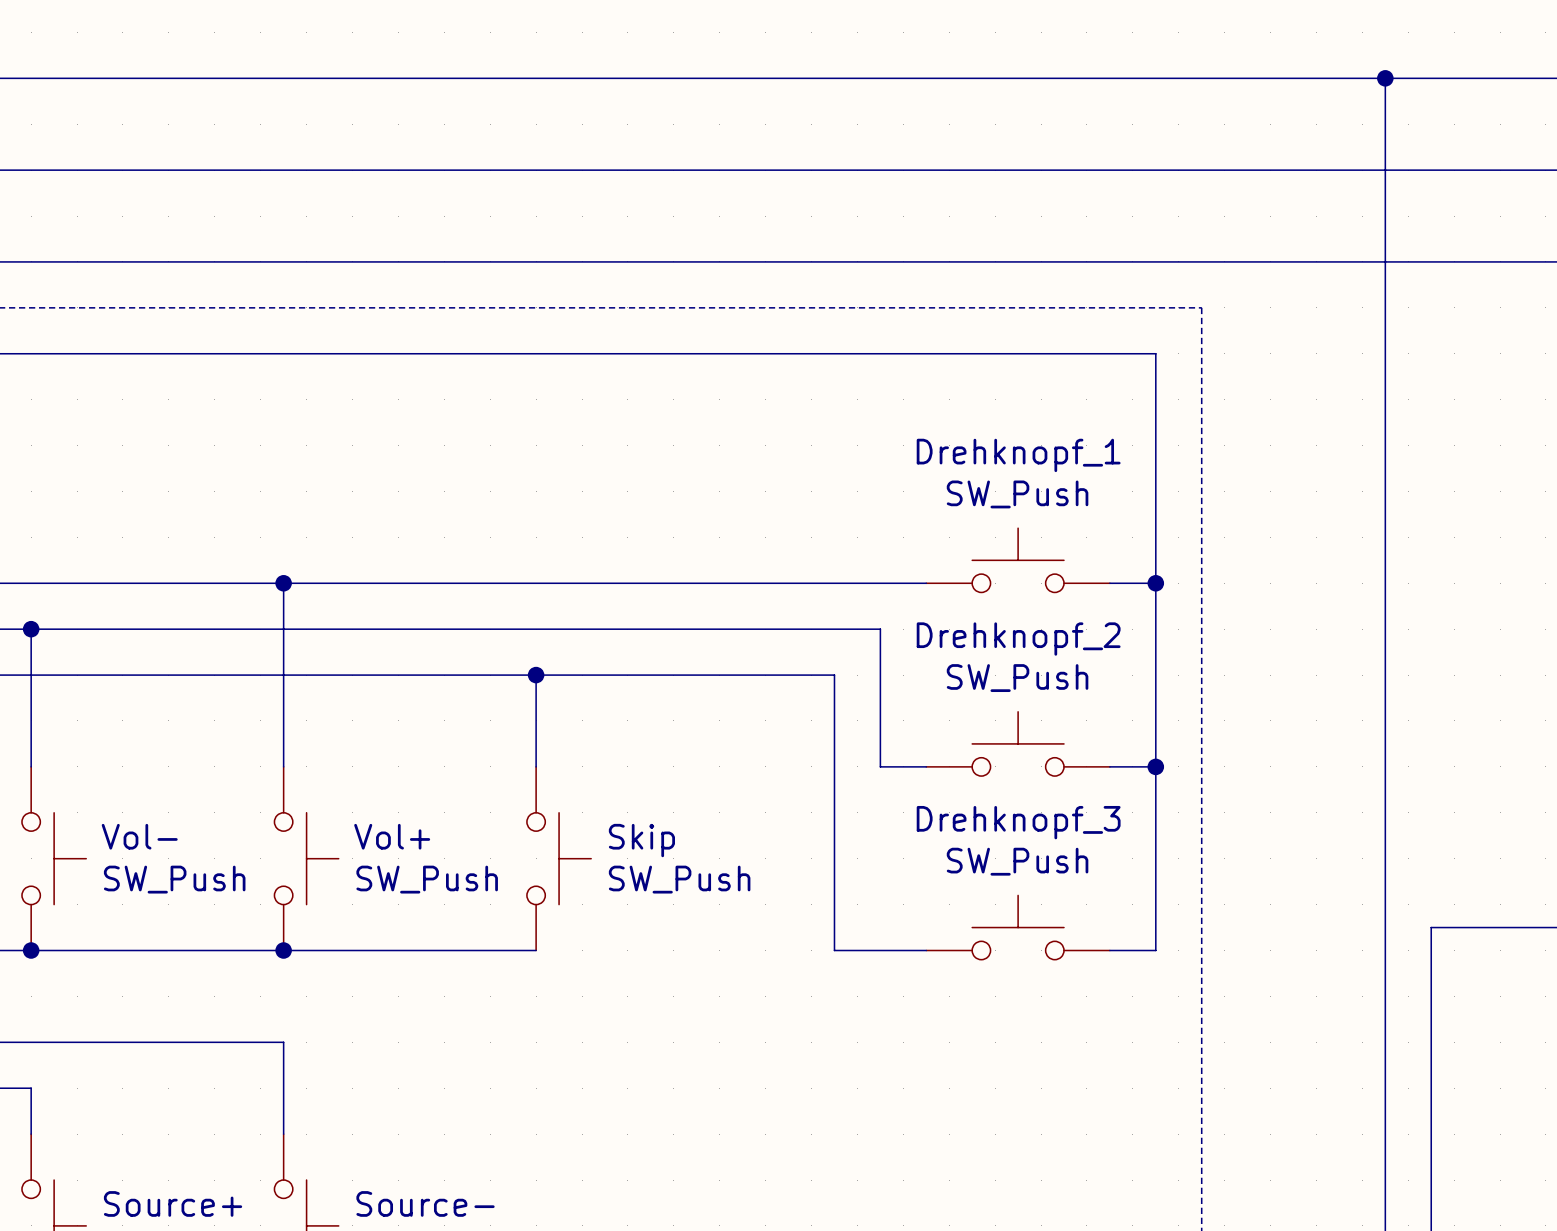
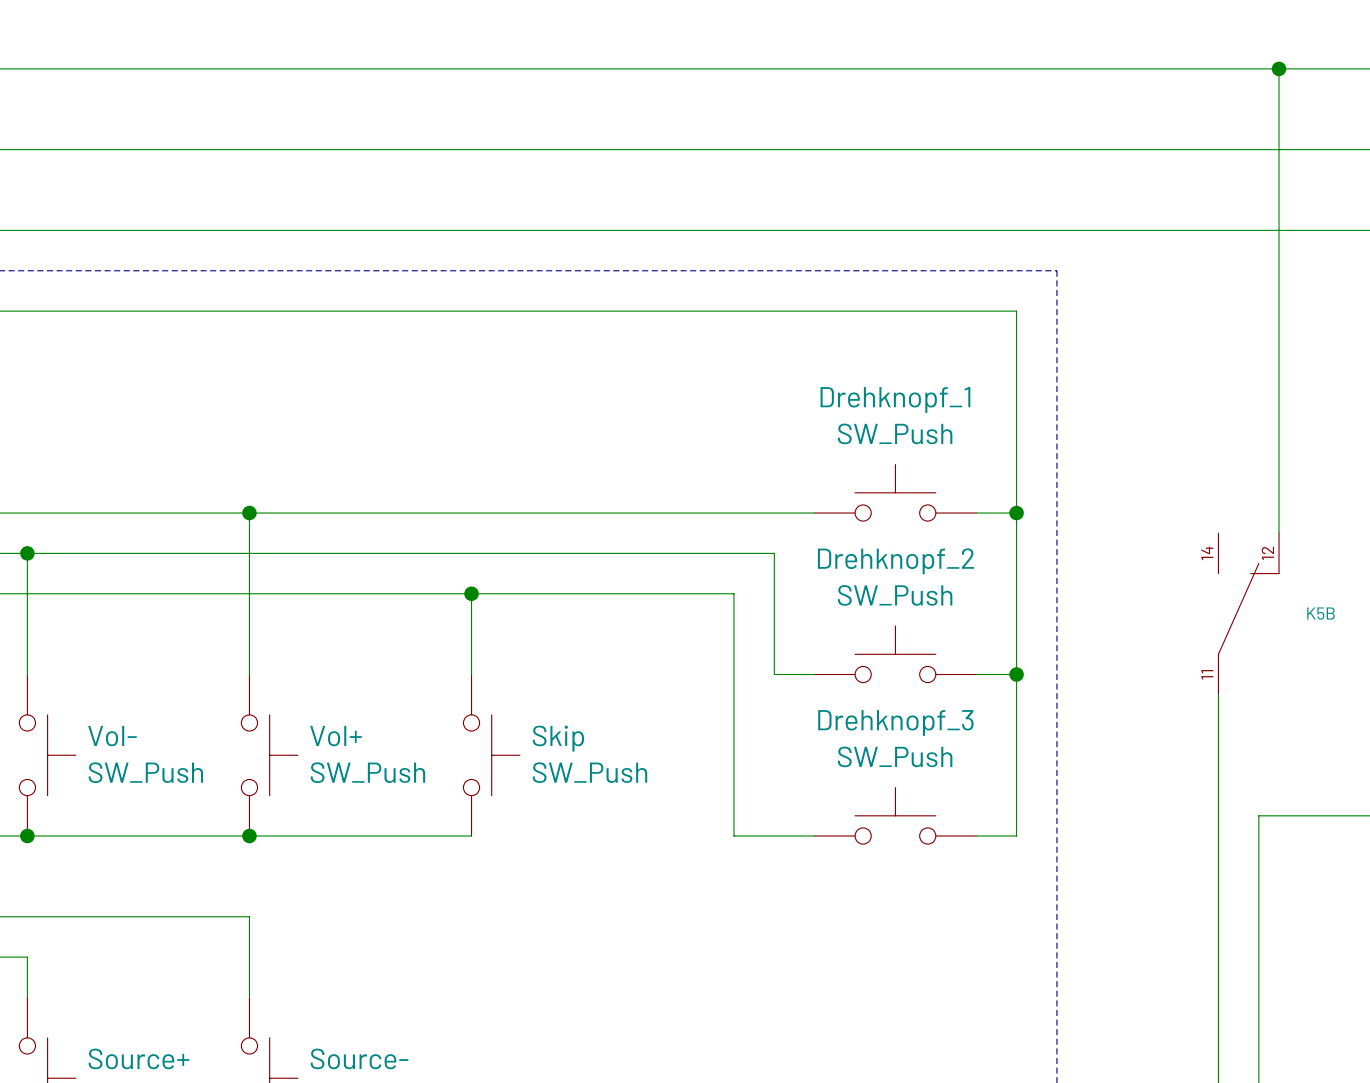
wire: (1385, 78) (1385, 789) -> none
junction position: (1385, 78) -> (1279, 68)
wire: none -> (1279, 68) (1279, 533)
K5B: none -> (1248, 613)

